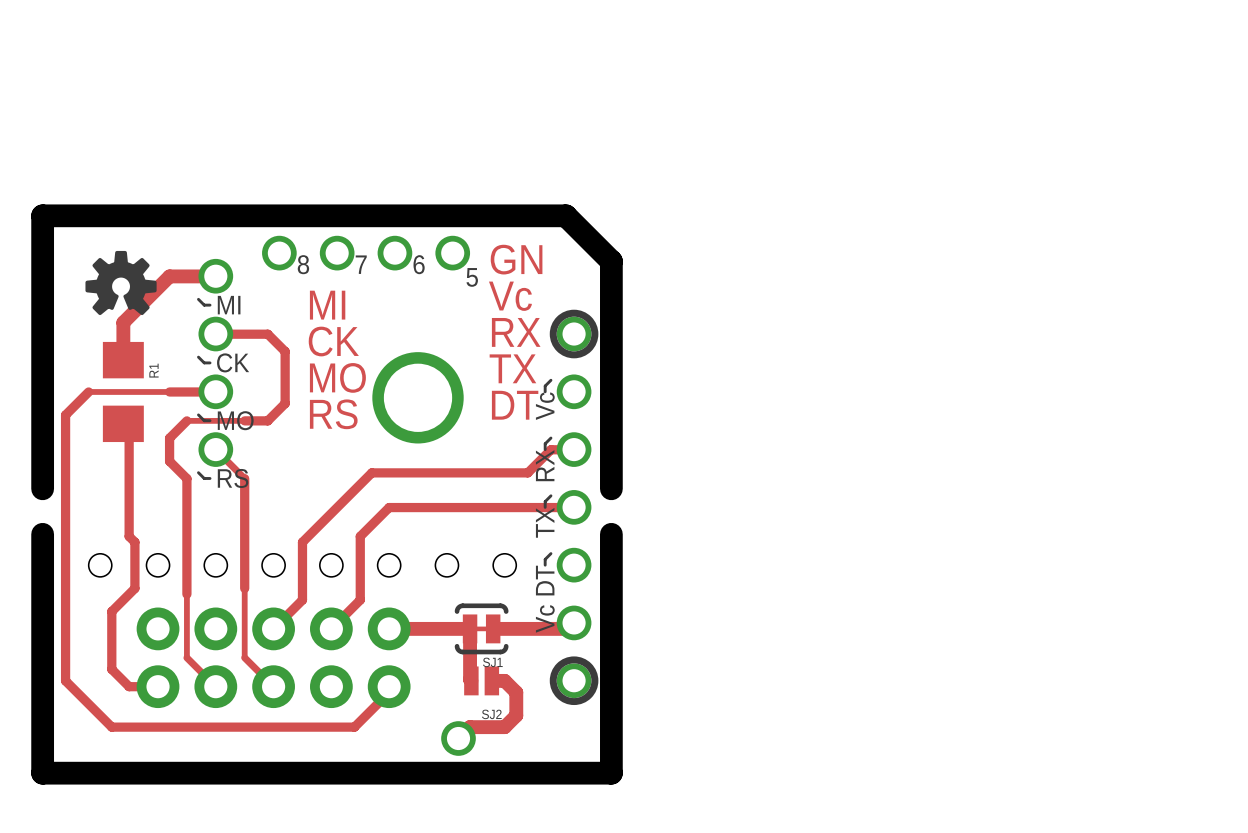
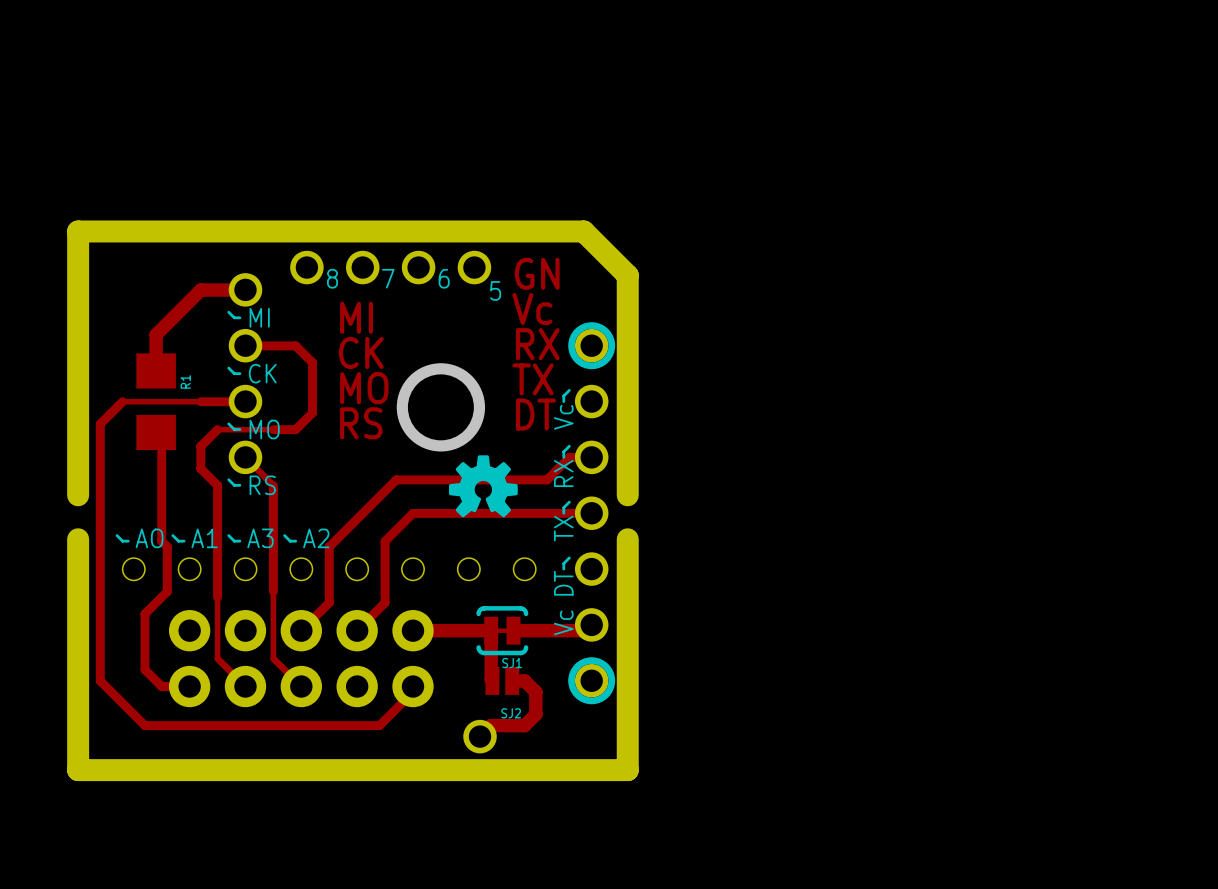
drawing position: (121, 283) -> (483, 486)
line: none -> (117, 535) (122, 541) (128, 541)
line: none -> (172, 535) (178, 541) (184, 541)
line: none -> (228, 535) (234, 541) (239, 541)
line: none -> (284, 535) (290, 541) (295, 541)
text: none -> AO (149, 538)
text: none -> A1 (204, 538)
text: none -> A3 (260, 538)
text: none -> A2 (316, 538)

